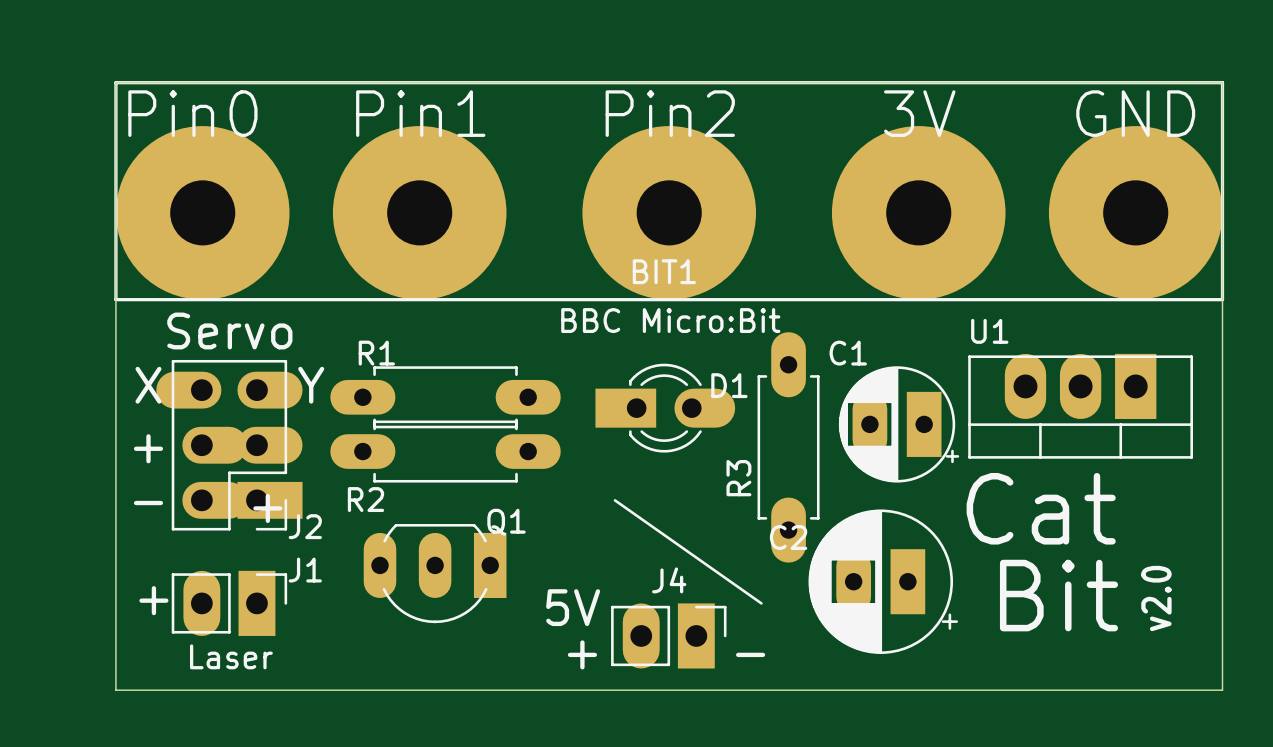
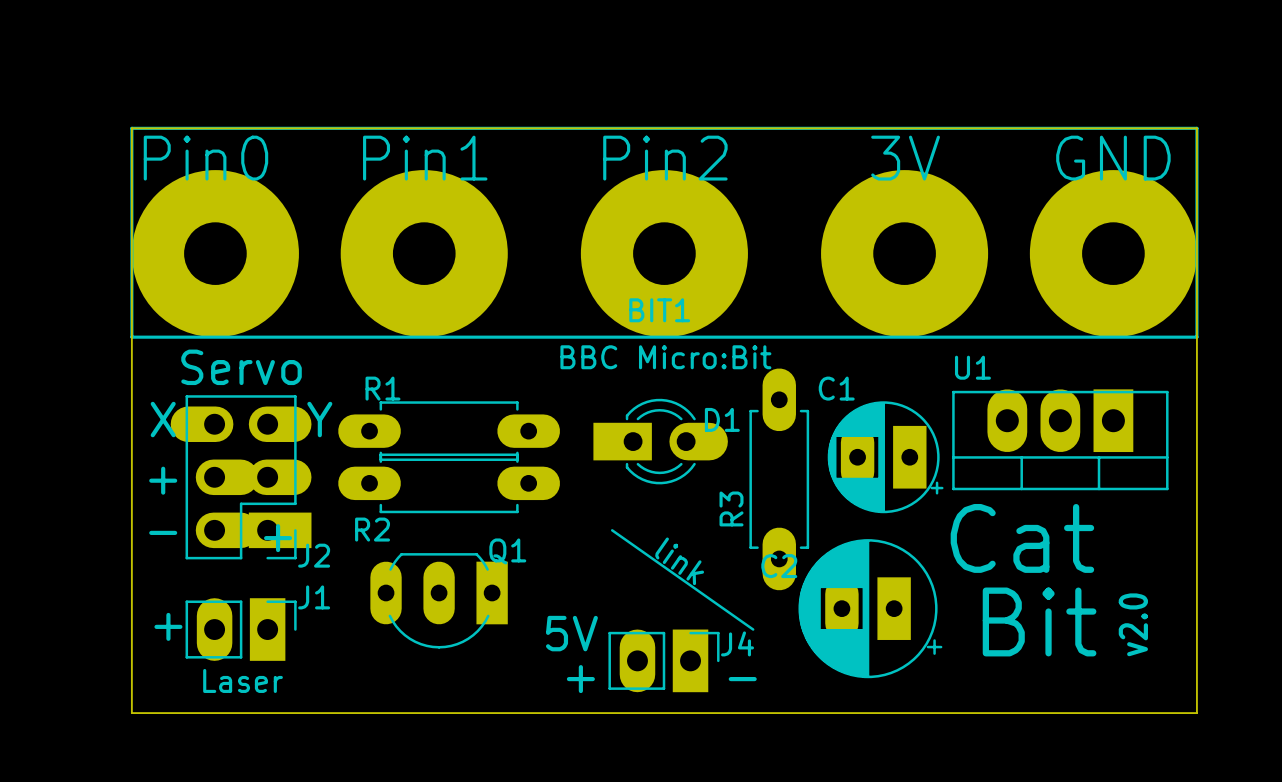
text: none -> link (679, 561)
J4 name position: J4 (669, 580) -> J4 (737, 643)

